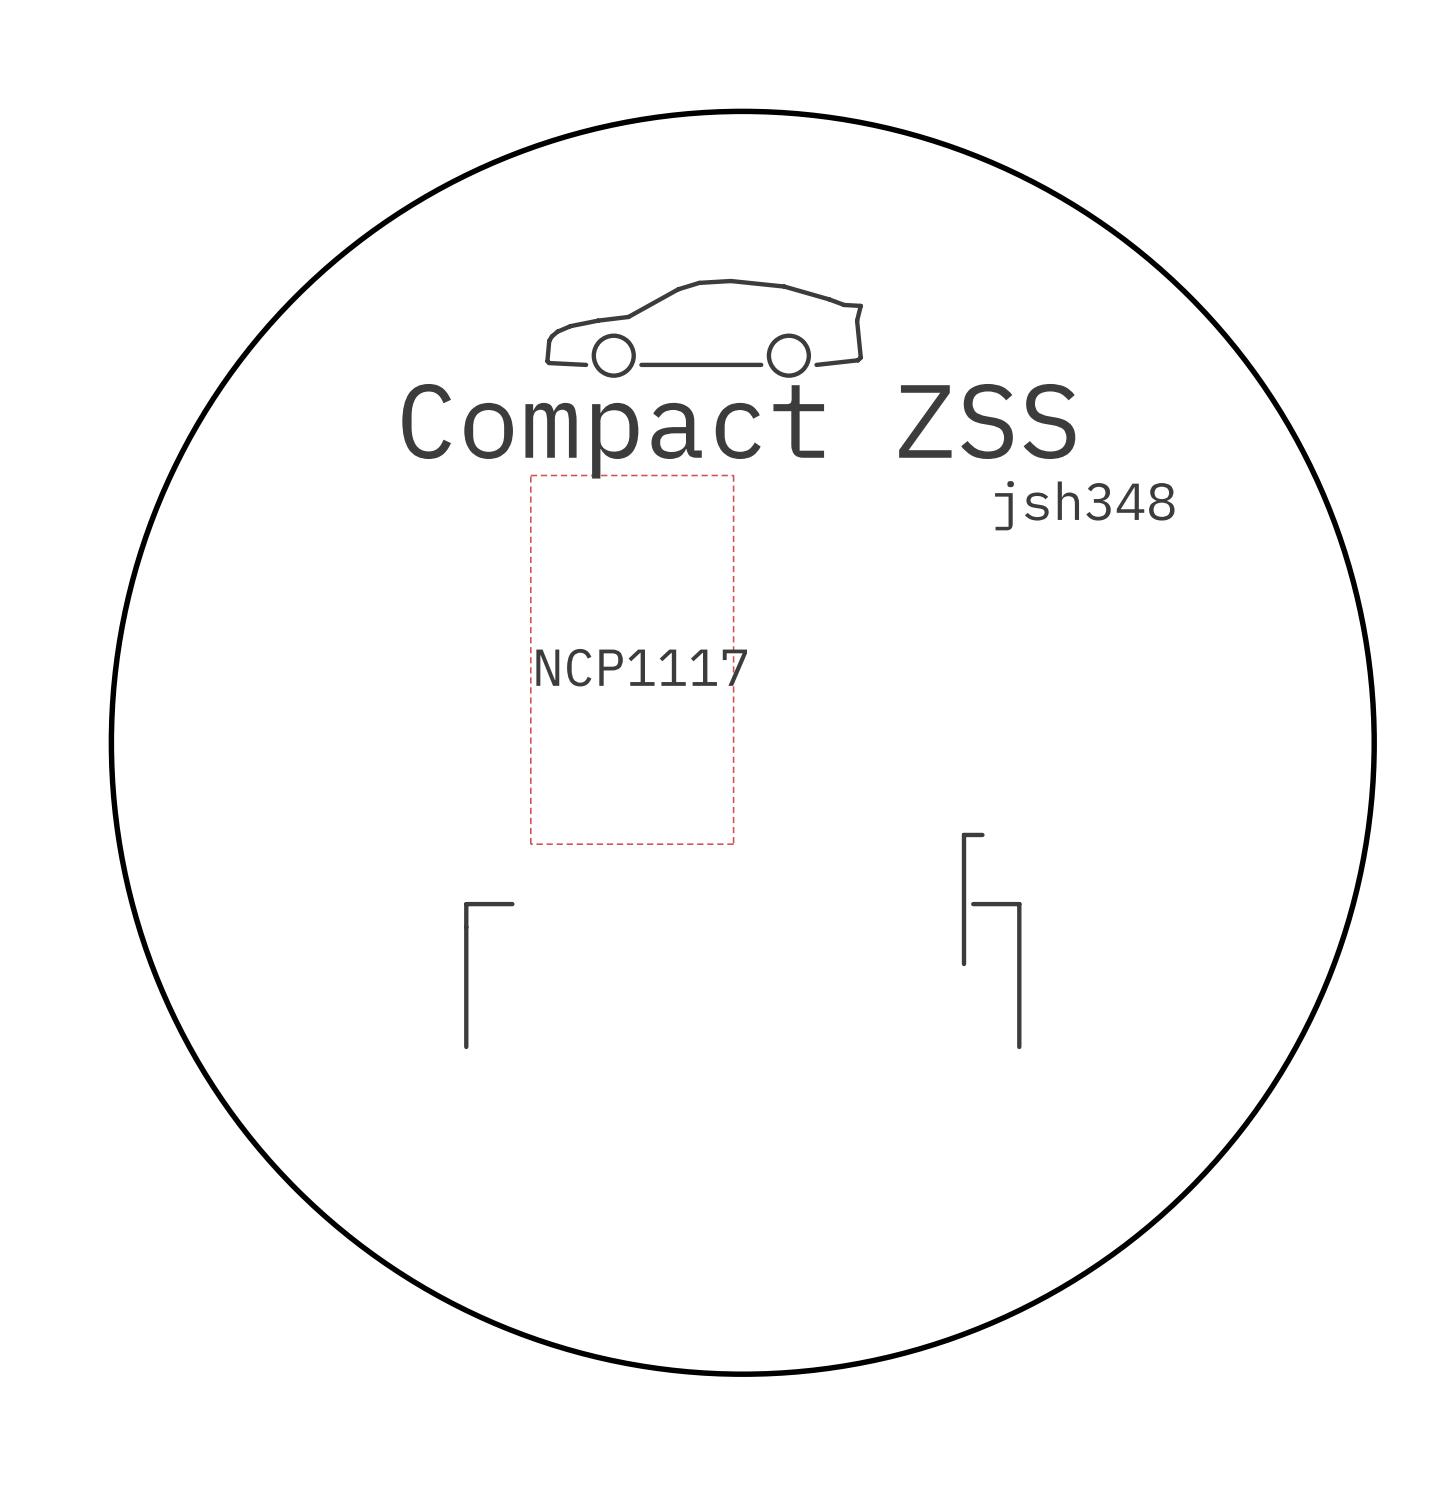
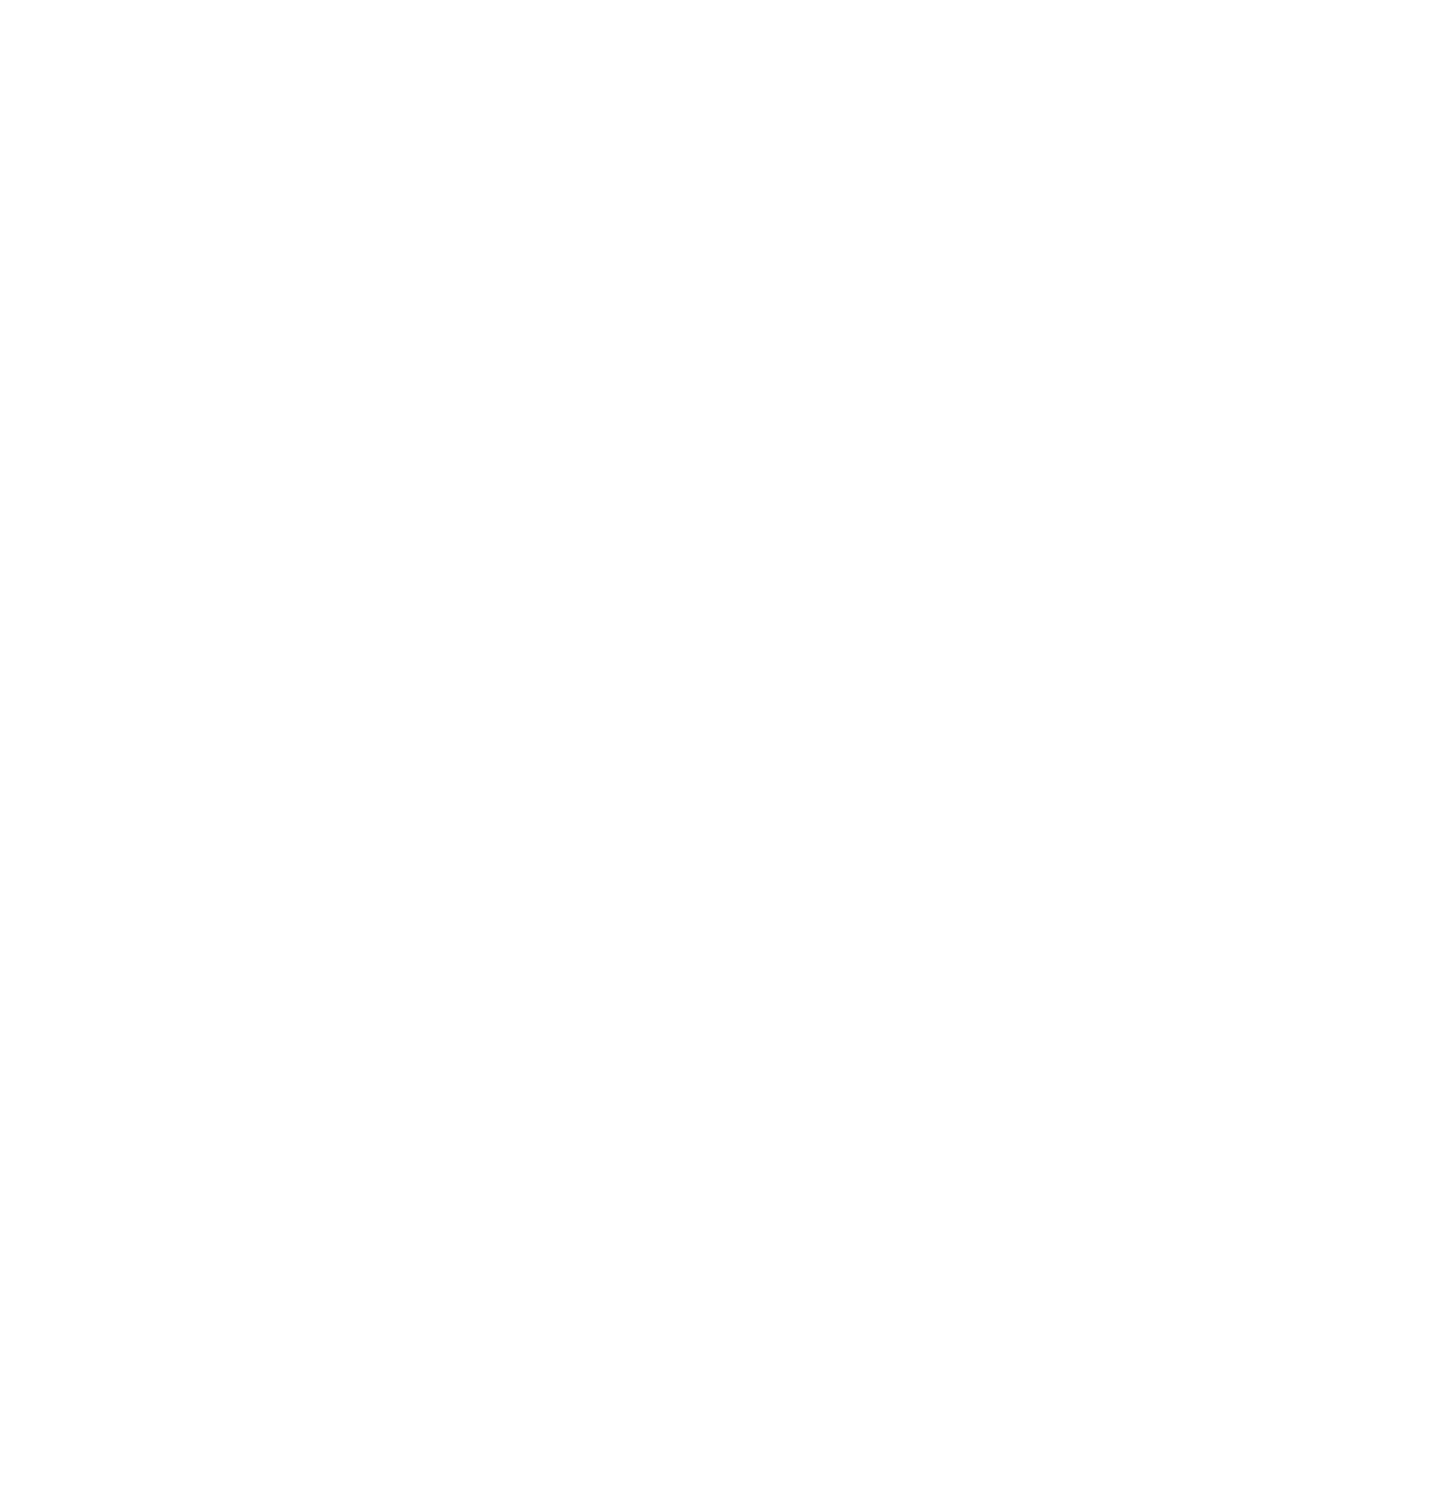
round board edge: [108, 108, 1377, 1377] -> none
drawing: [591, 333, 636, 378] -> none
drawing: [766, 333, 812, 378] -> none
line: (586, 364) (549, 363) (547, 361) (549, 340) (552, 336) (570, 326) (628, 316) (678, 289) (699, 282) (730, 281) (784, 286) (844, 304) (860, 305) (857, 320) (860, 357) (858, 360) (816, 364) -> none
line: (641, 364) (761, 364) -> none
text: Compact ZSS (738, 431) -> none
top zone outline: (530, 475) (733, 475) (733, 844) (530, 844) (530, 475) -> none
text: jsh348 (1084, 505) -> none
text: NCP1117 (641, 667) -> none
line: (982, 834) (964, 834) (964, 964) -> none
line: (512, 904) (466, 904) (466, 1046) -> none
line: (973, 904) (1019, 904) (1019, 1046) -> none

